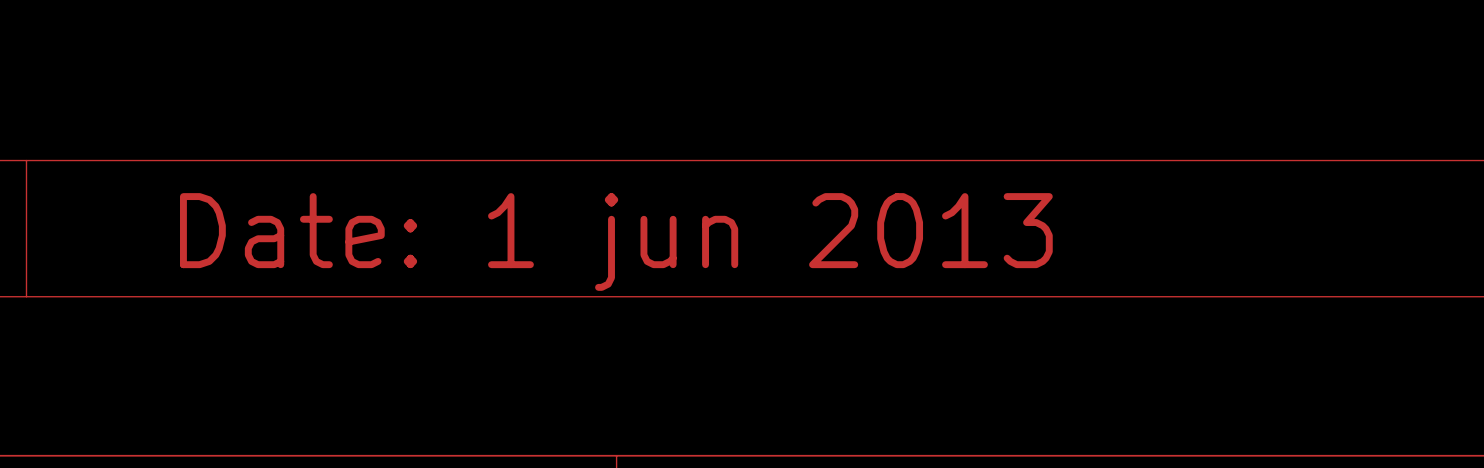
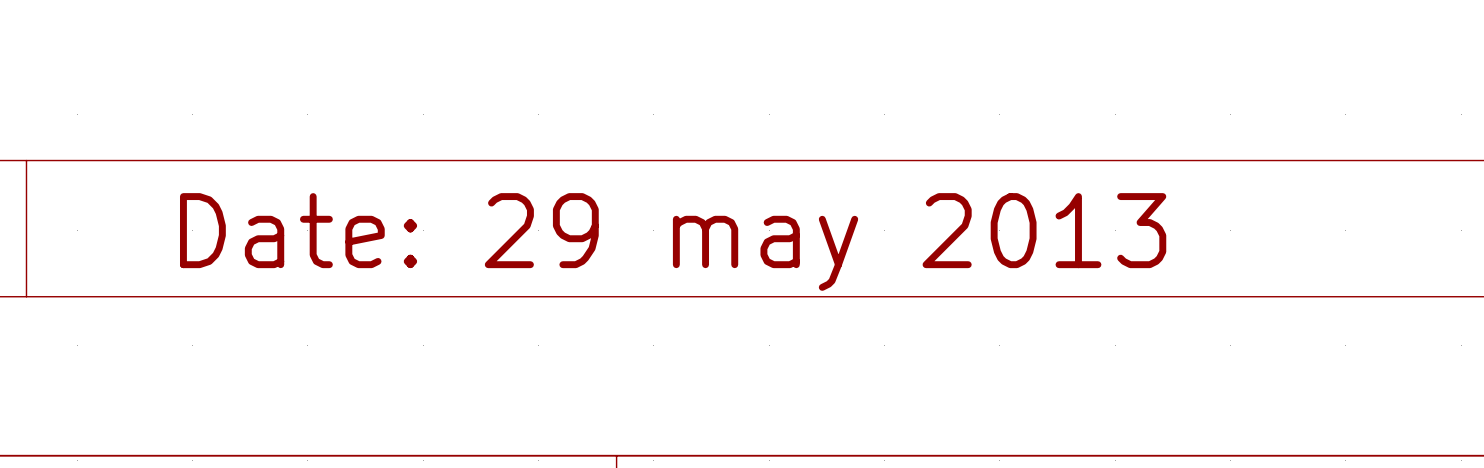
title block: Date: 1 jun 2013 (616, 241) -> Date: 29 may 2013 (673, 241)

